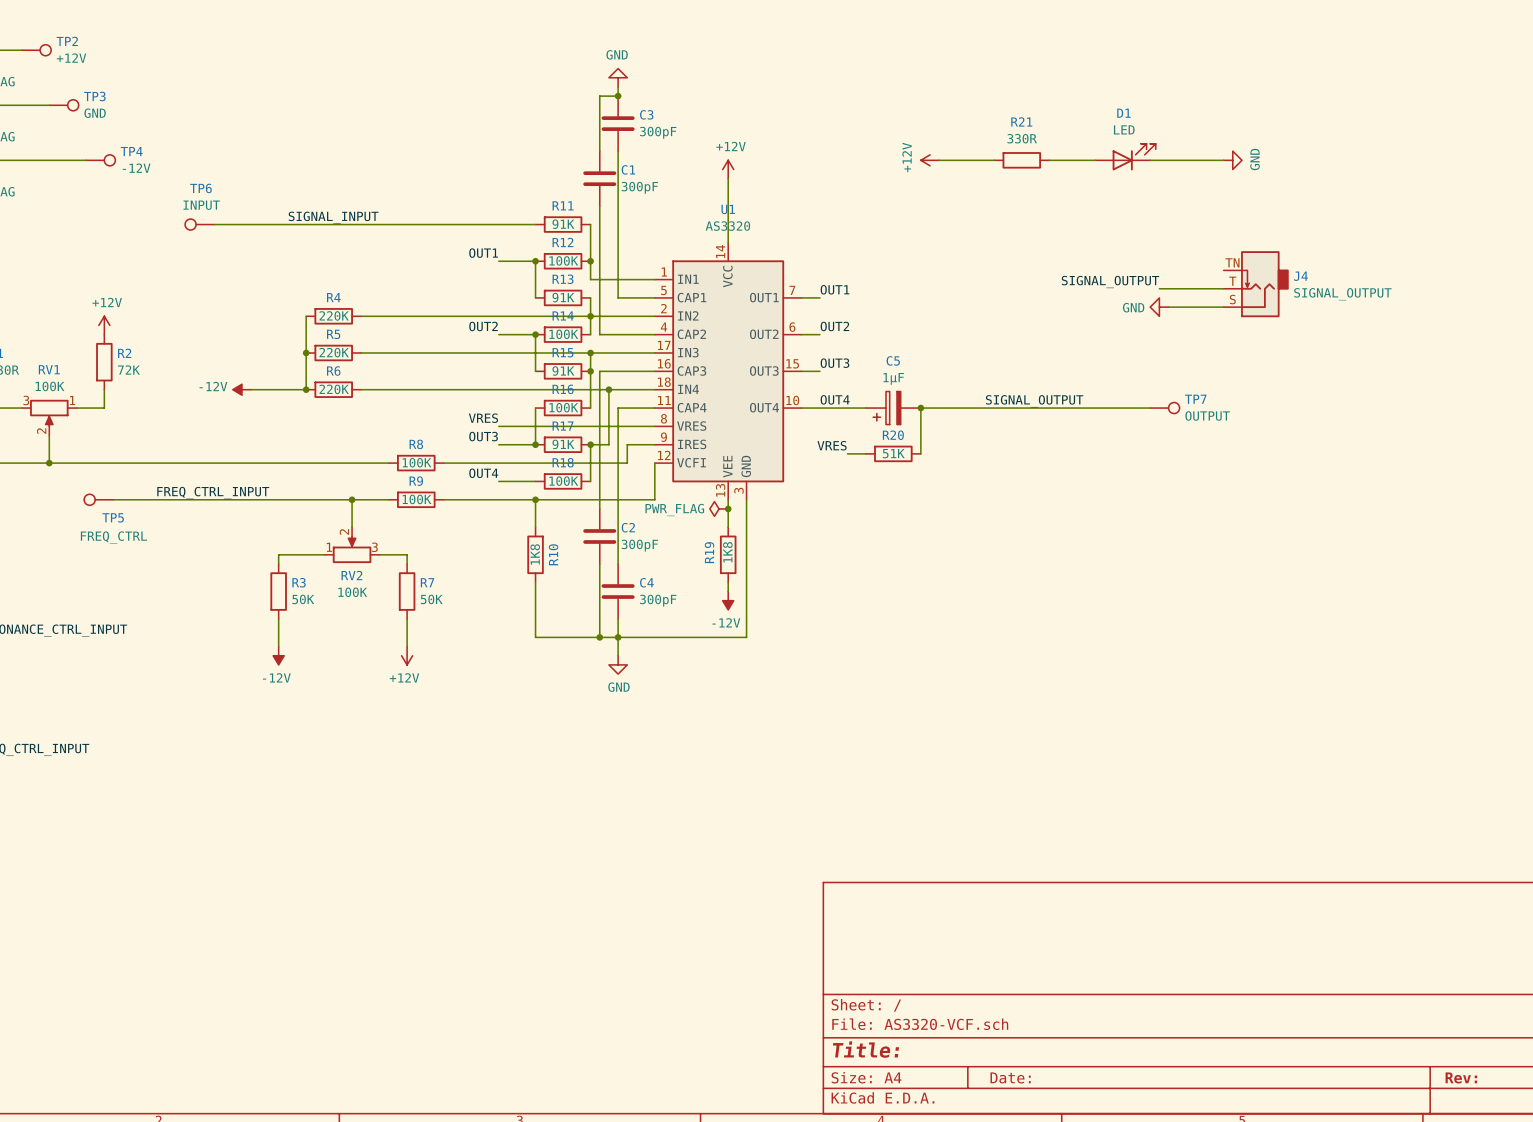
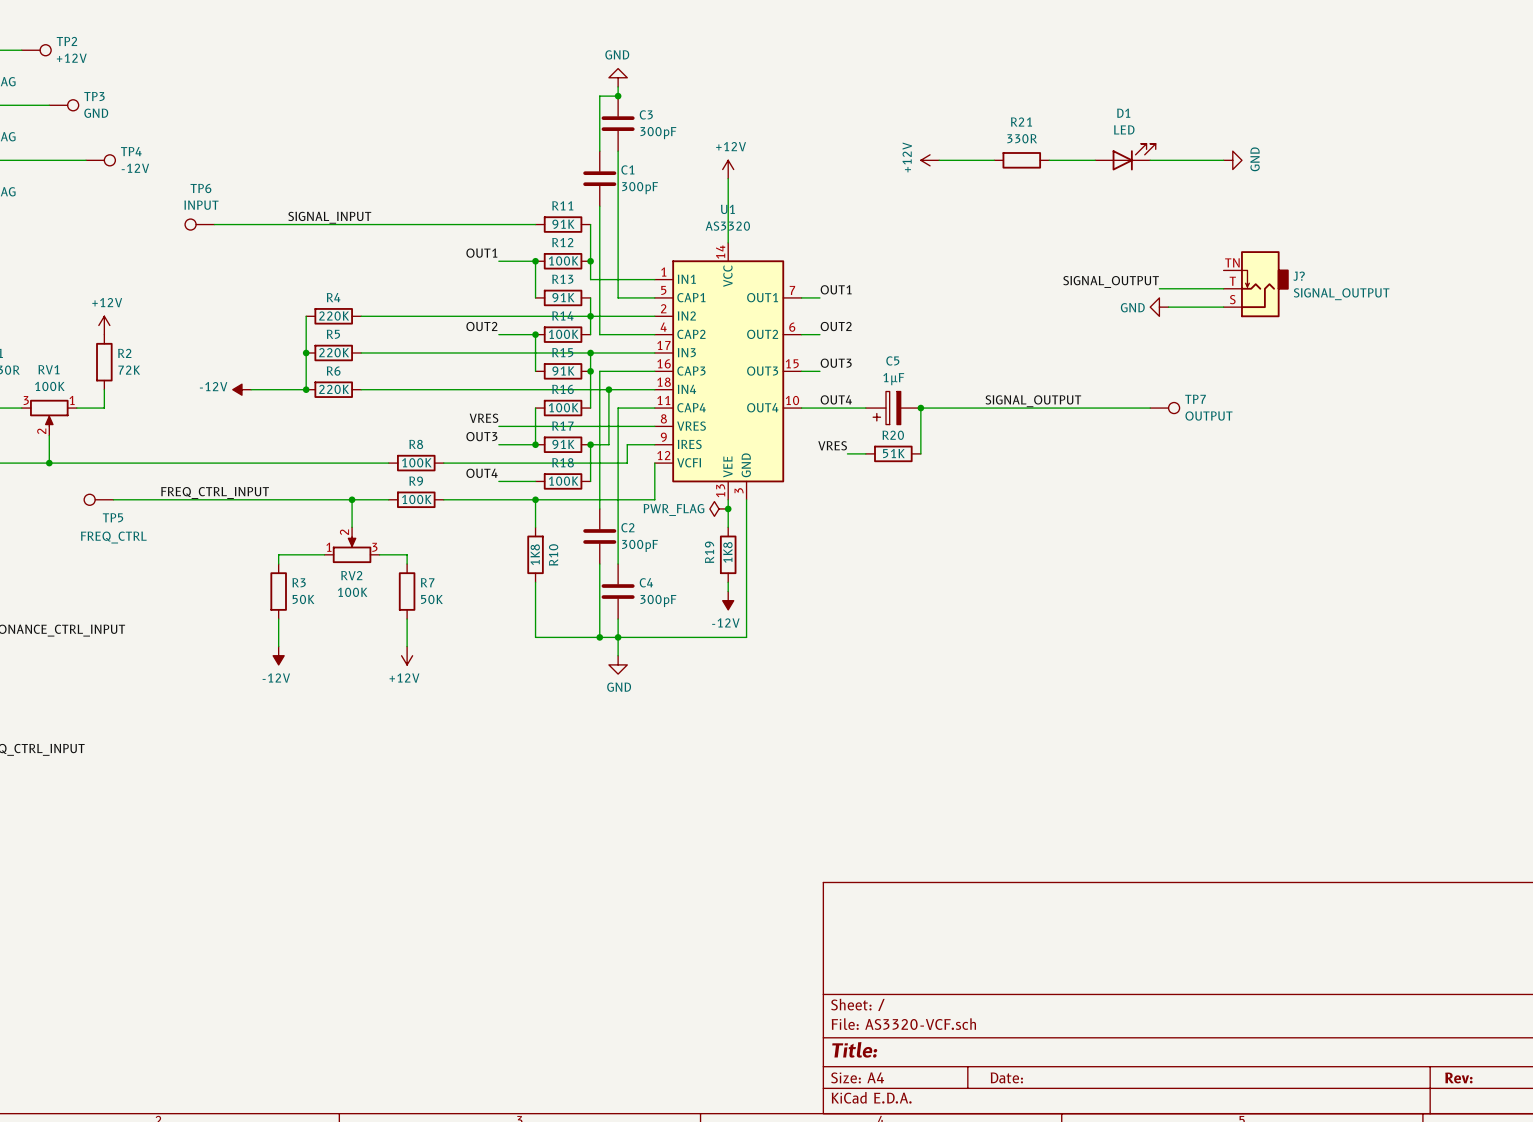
J4 name: J4 (1300, 276) -> J? (1299, 276)

